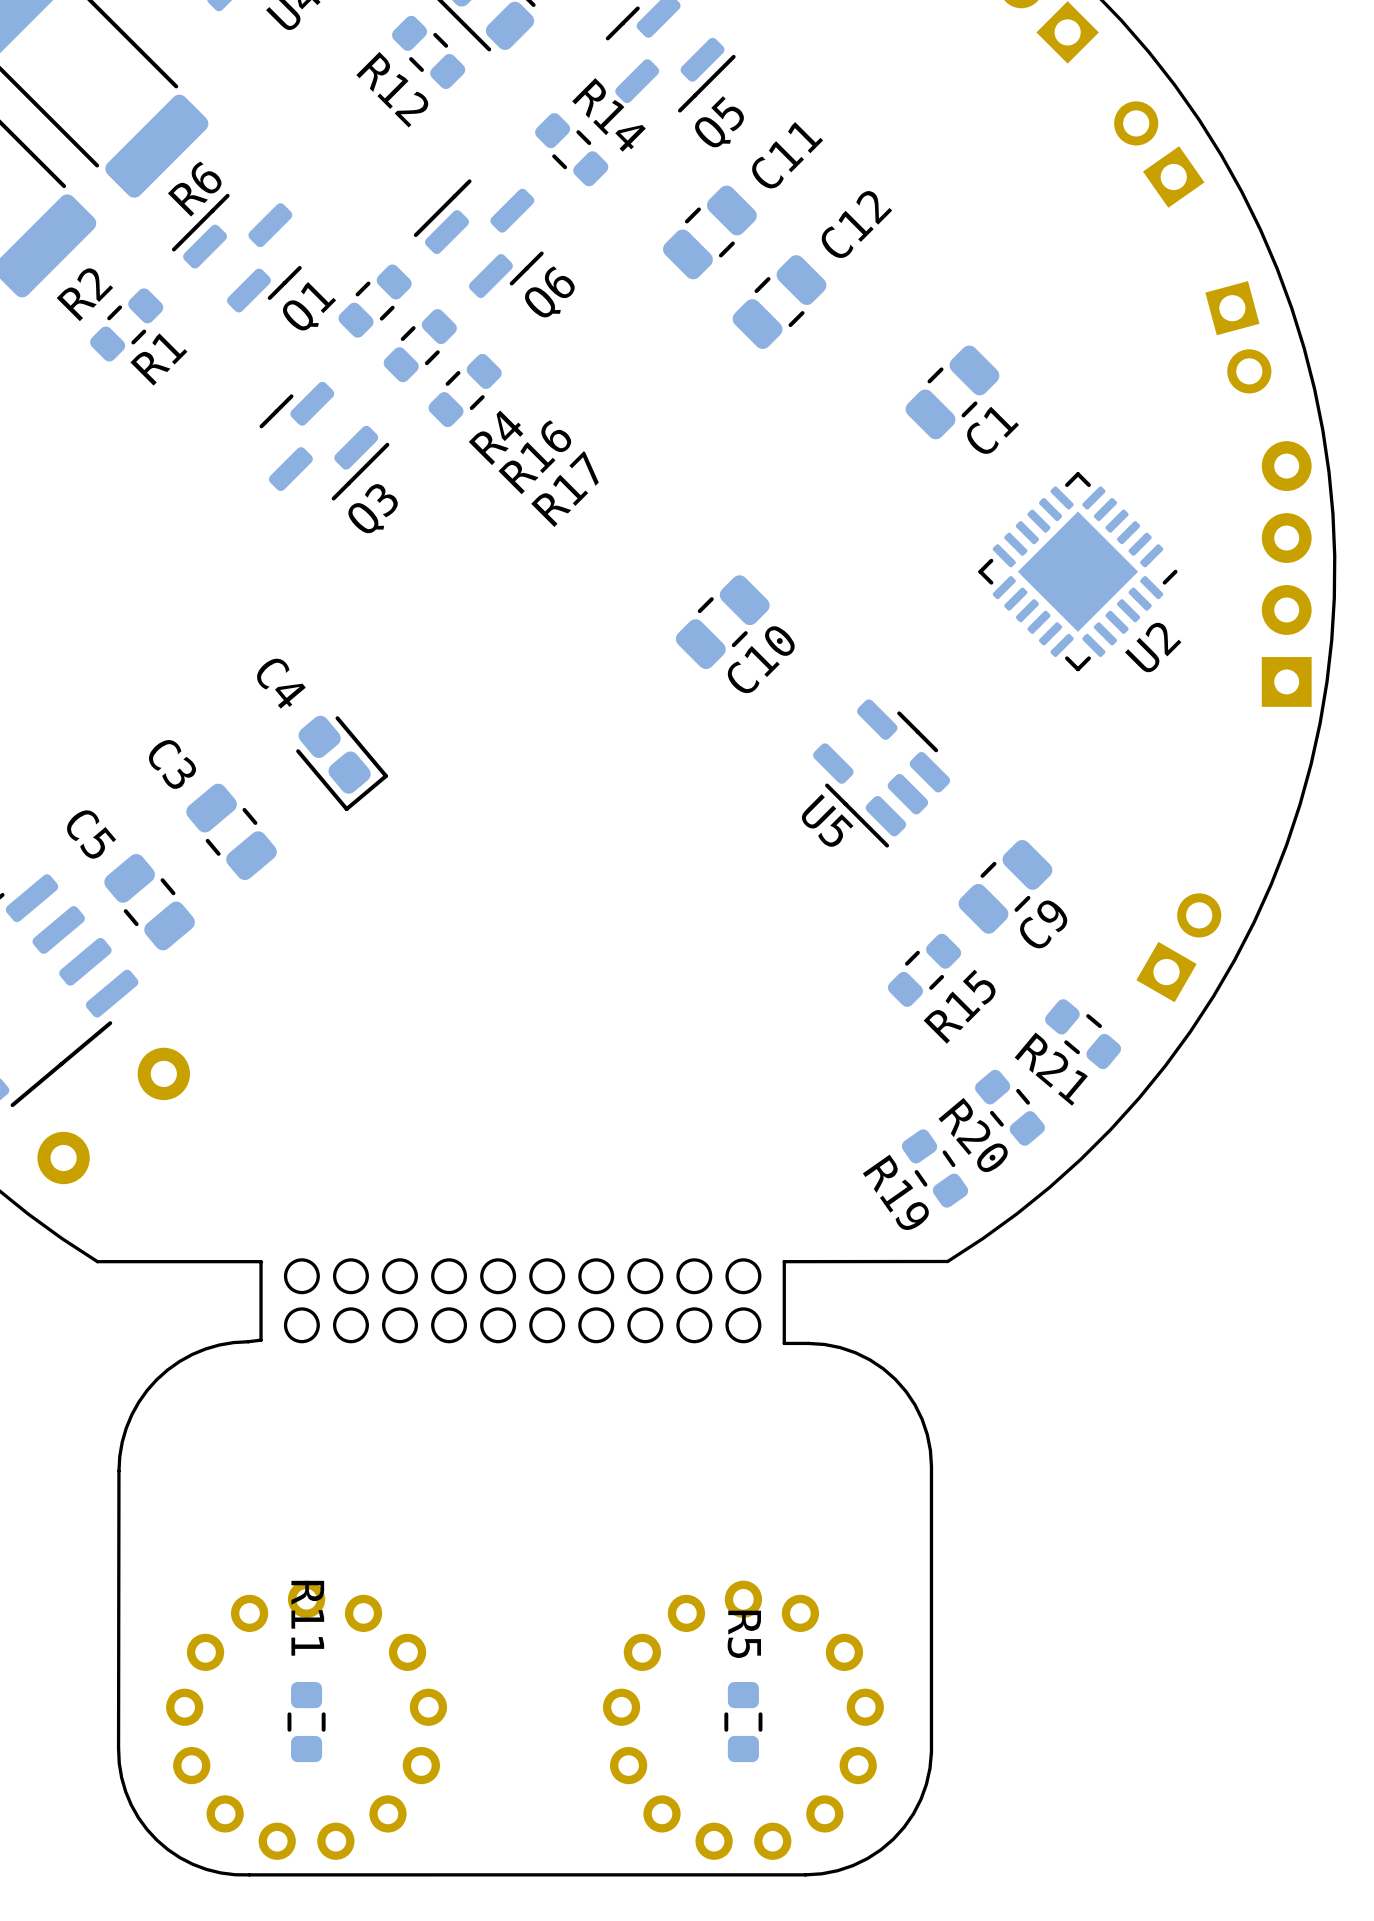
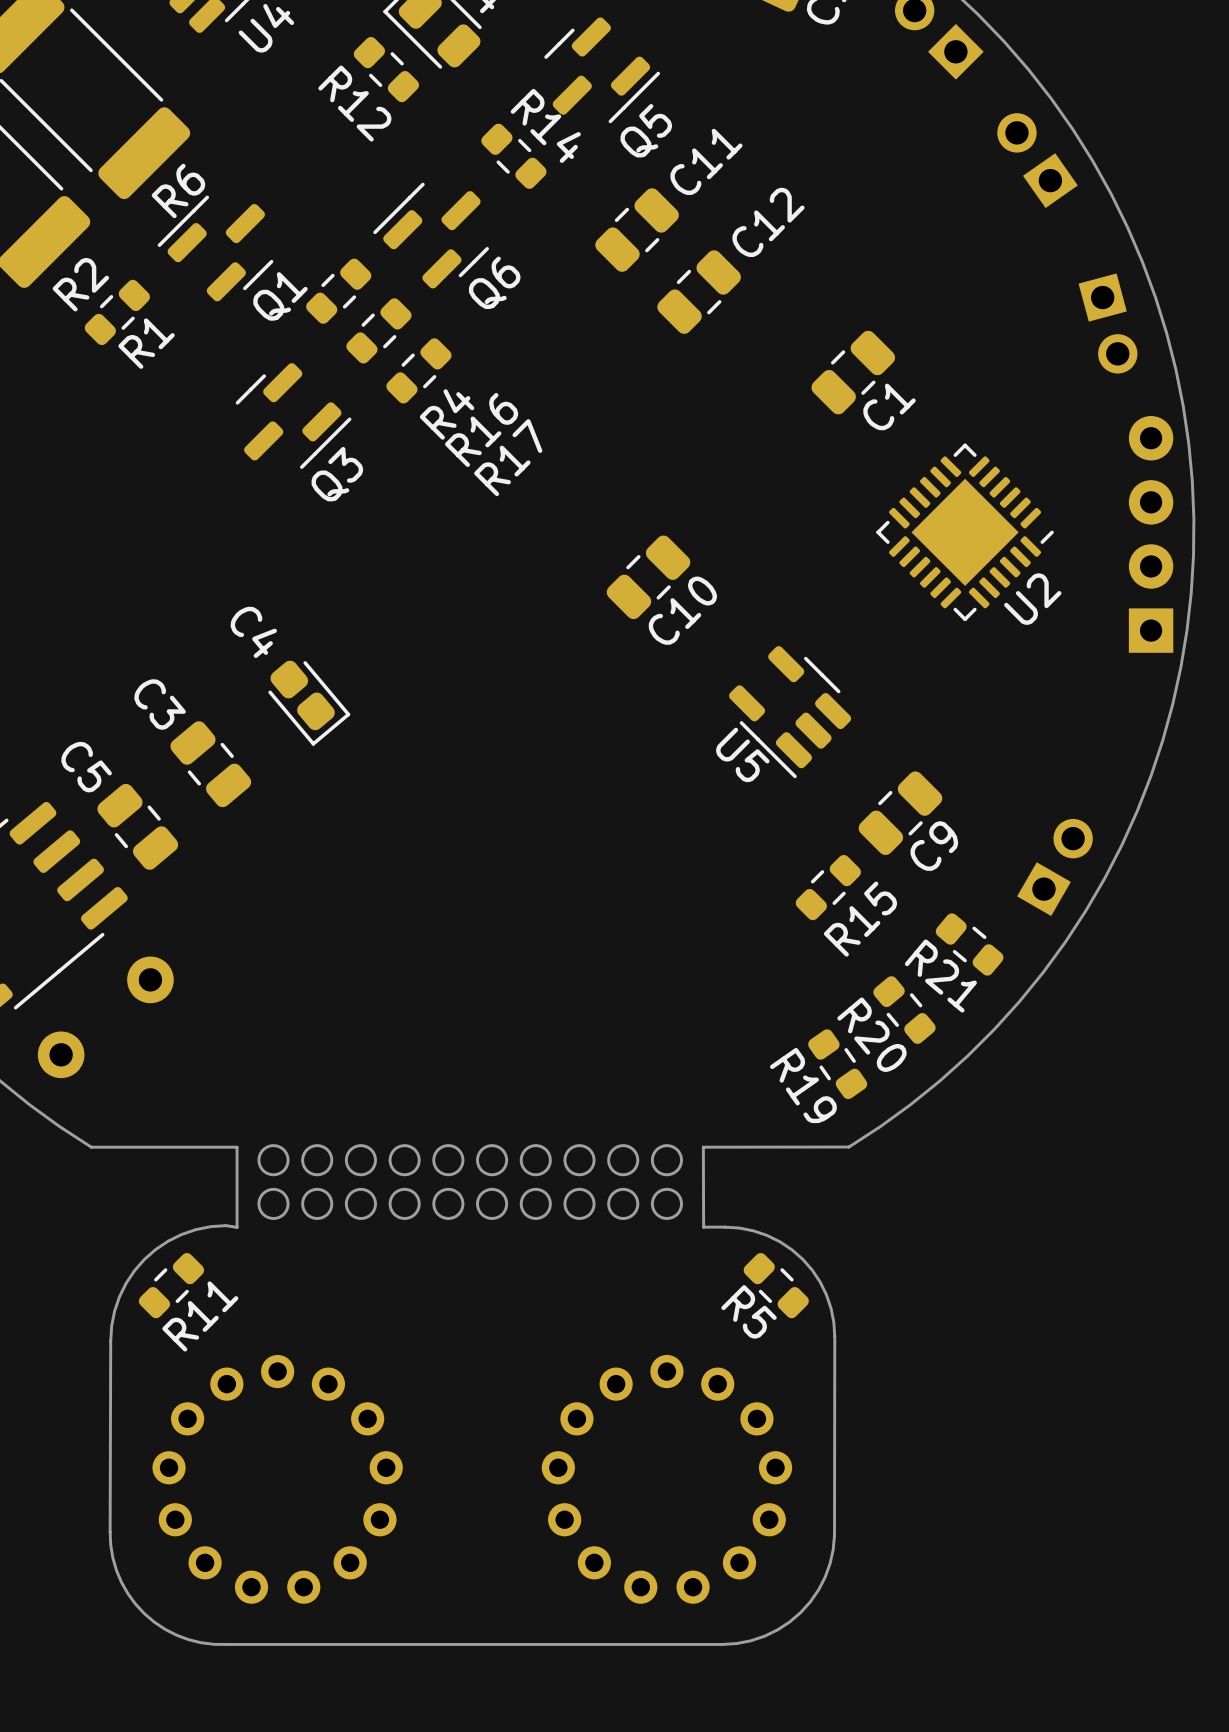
board edge: (784, 1261) (784, 1343) (824, 1344) (840, 1347) (870, 1359) (883, 1368) (906, 1391) (922, 1419) (927, 1434) (931, 1466) (931, 1752) (926, 1784) (913, 1813) (893, 1839) (867, 1858) (837, 1870) (821, 1873) (235, 1874) (220, 1872) (192, 1864) (179, 1857) (156, 1840) (146, 1829) (131, 1805) (125, 1791) (119, 1763) (118, 1471) (122, 1442) (126, 1428) (138, 1402) (156, 1379) (167, 1369) (179, 1361) (205, 1349) (233, 1342) (261, 1340) -> (703, 1147) (703, 1227) (739, 1228) (753, 1230) (767, 1235) (791, 1249) (802, 1259) (820, 1281) (831, 1308) (833, 1322) (834, 1535) (830, 1563) (825, 1577) (810, 1601) (789, 1622) (764, 1636) (736, 1643) (213, 1644) (201, 1642) (176, 1635) (154, 1621) (135, 1603) (121, 1582) (112, 1557) (110, 1545) (110, 1340) (114, 1311) (126, 1283) (144, 1259) (155, 1249) (168, 1241) (196, 1229) (225, 1225) (237, 1227) (237, 1217)
R11 name position: R11 (307, 1618) -> R11 (200, 1316)
R5 name position: R5 (744, 1634) -> R5 (749, 1311)
part position: (306, 1720) -> (277, 1479)
part position: (743, 1720) -> (666, 1479)
R11 rotation: 0° (306, 1722) -> 45° clockwise (171, 1285)
R11 position: (306, 1722) -> (171, 1285)
R5 rotation: 0° (743, 1722) -> 45° counterclockwise (776, 1285)
R5 position: (743, 1722) -> (776, 1285)

